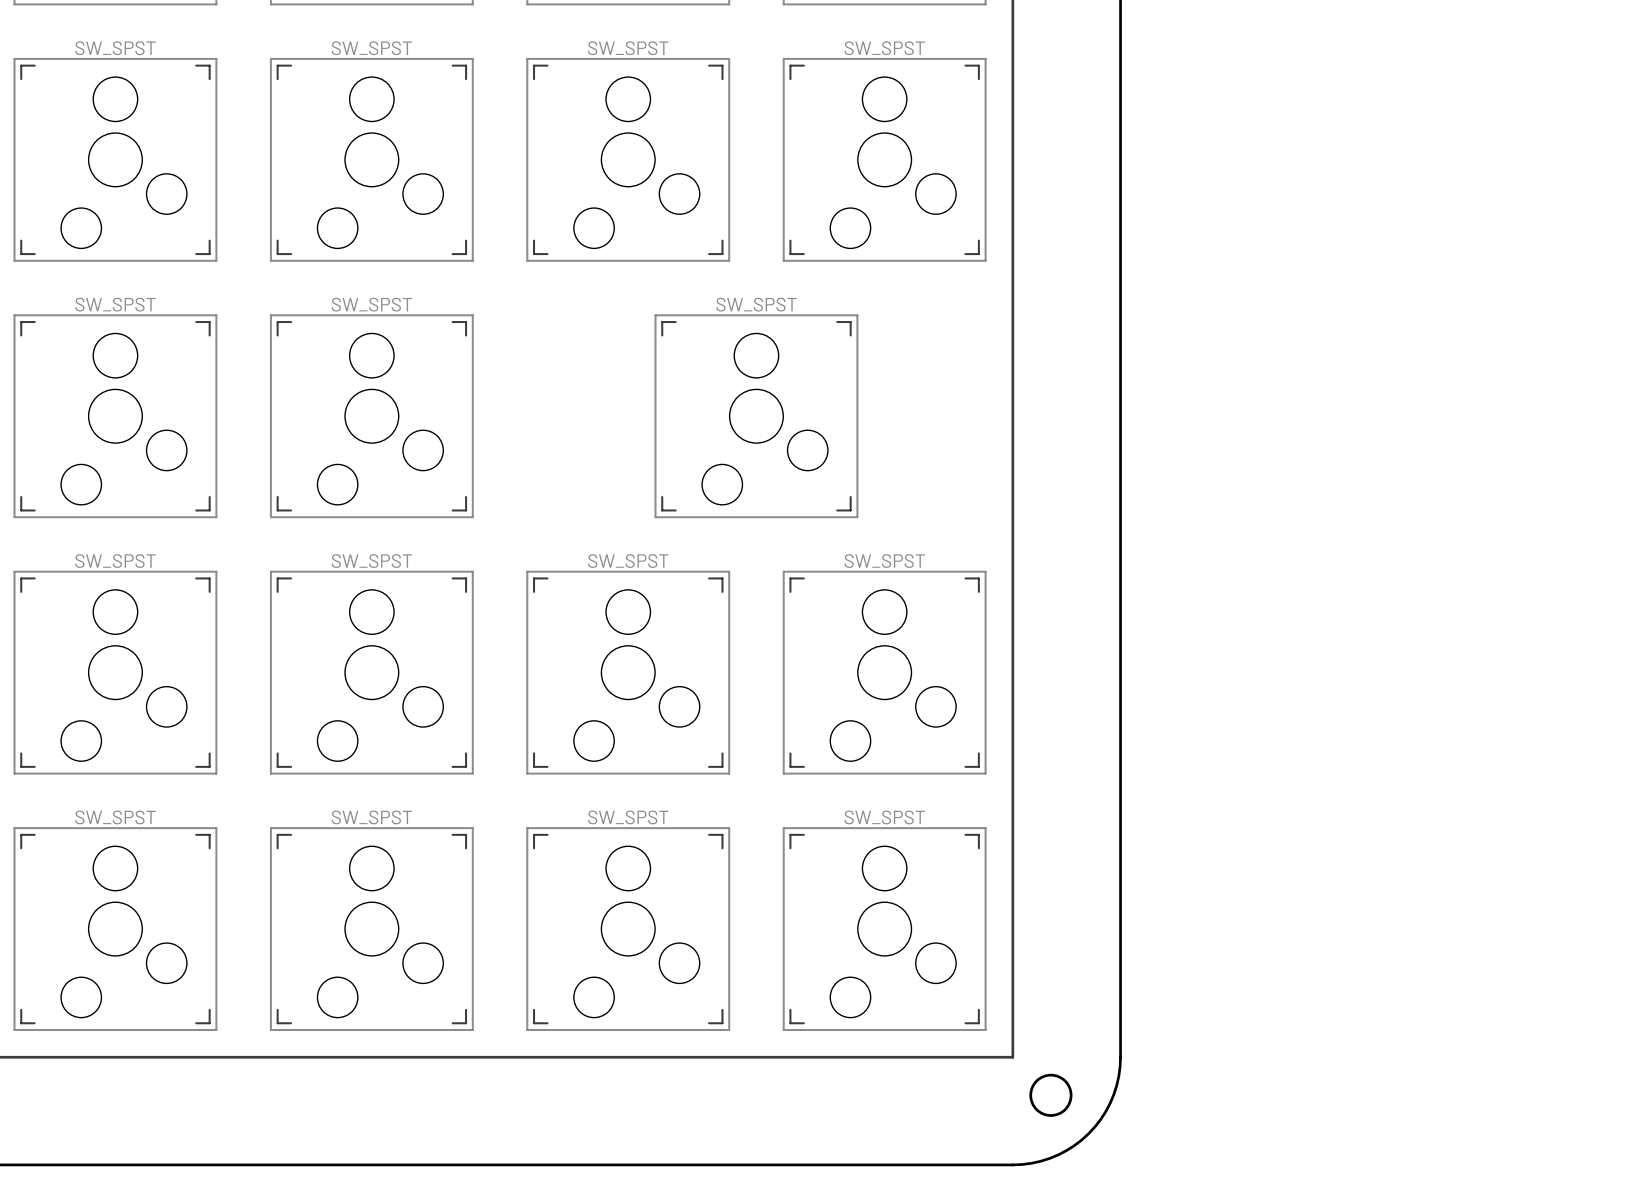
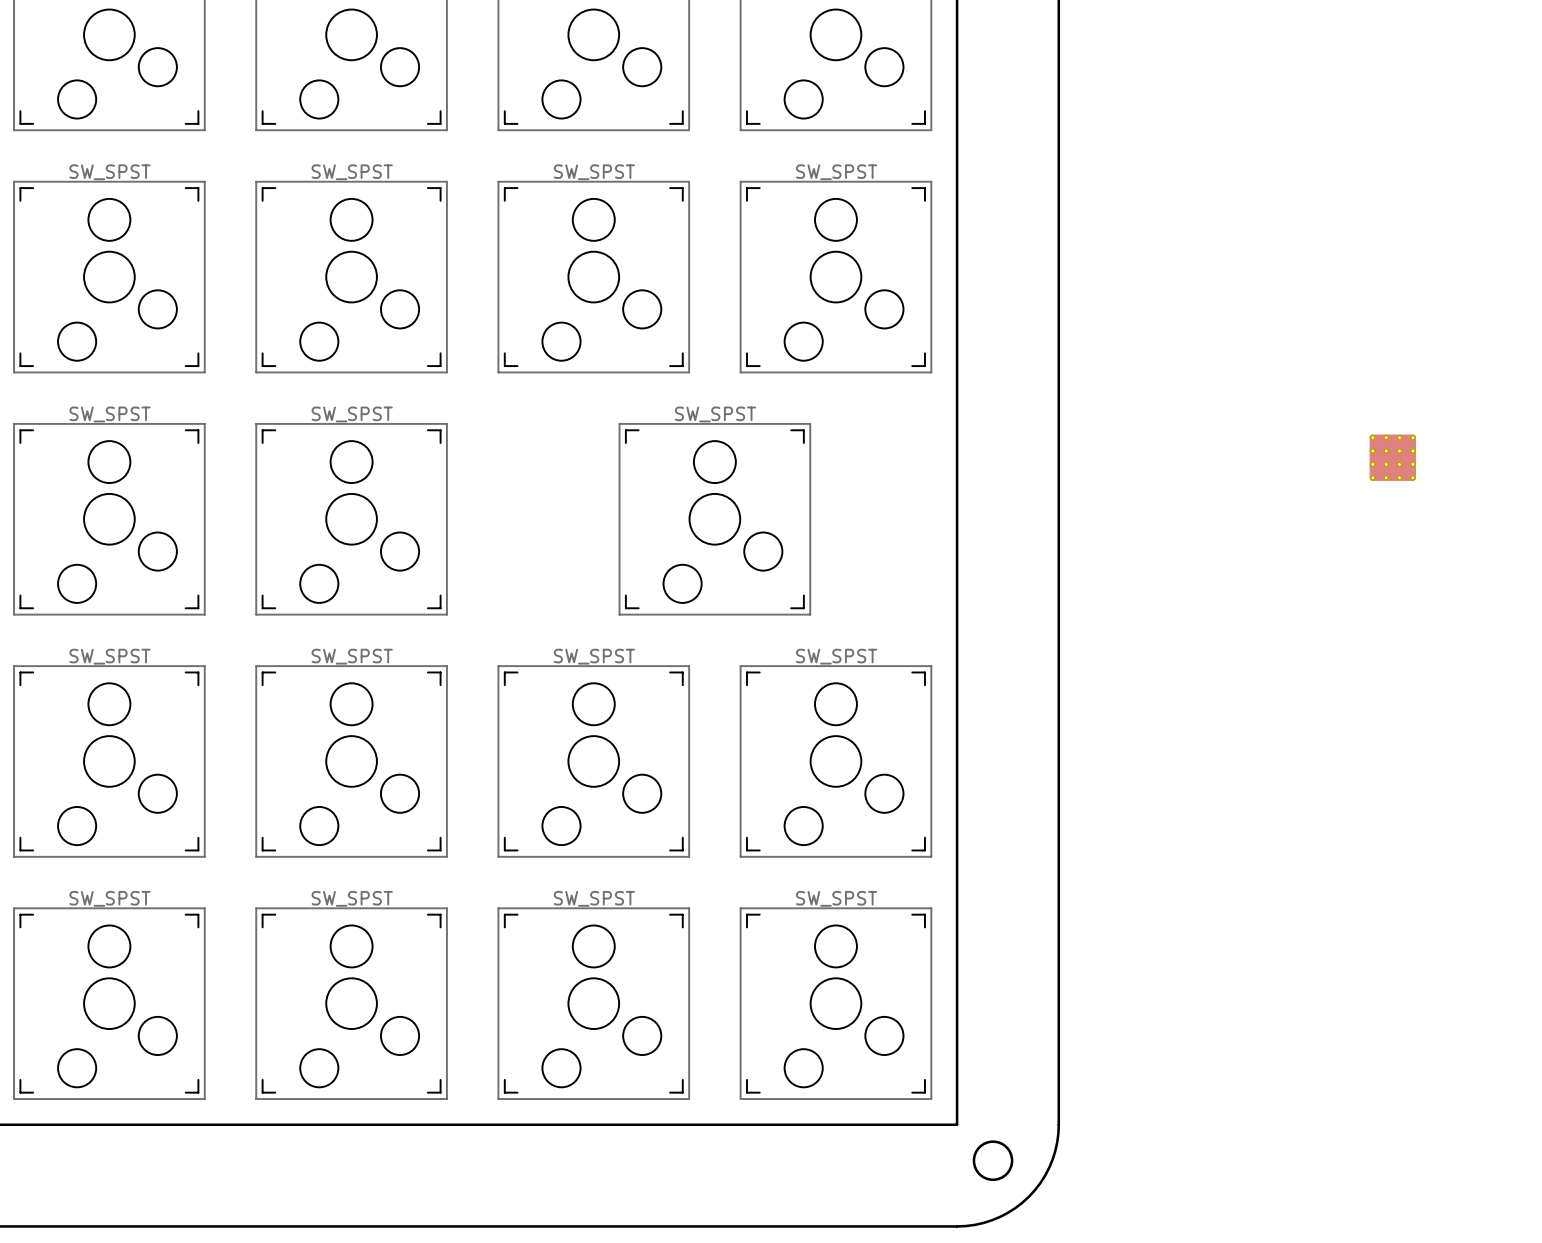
part: none -> (1392, 457)

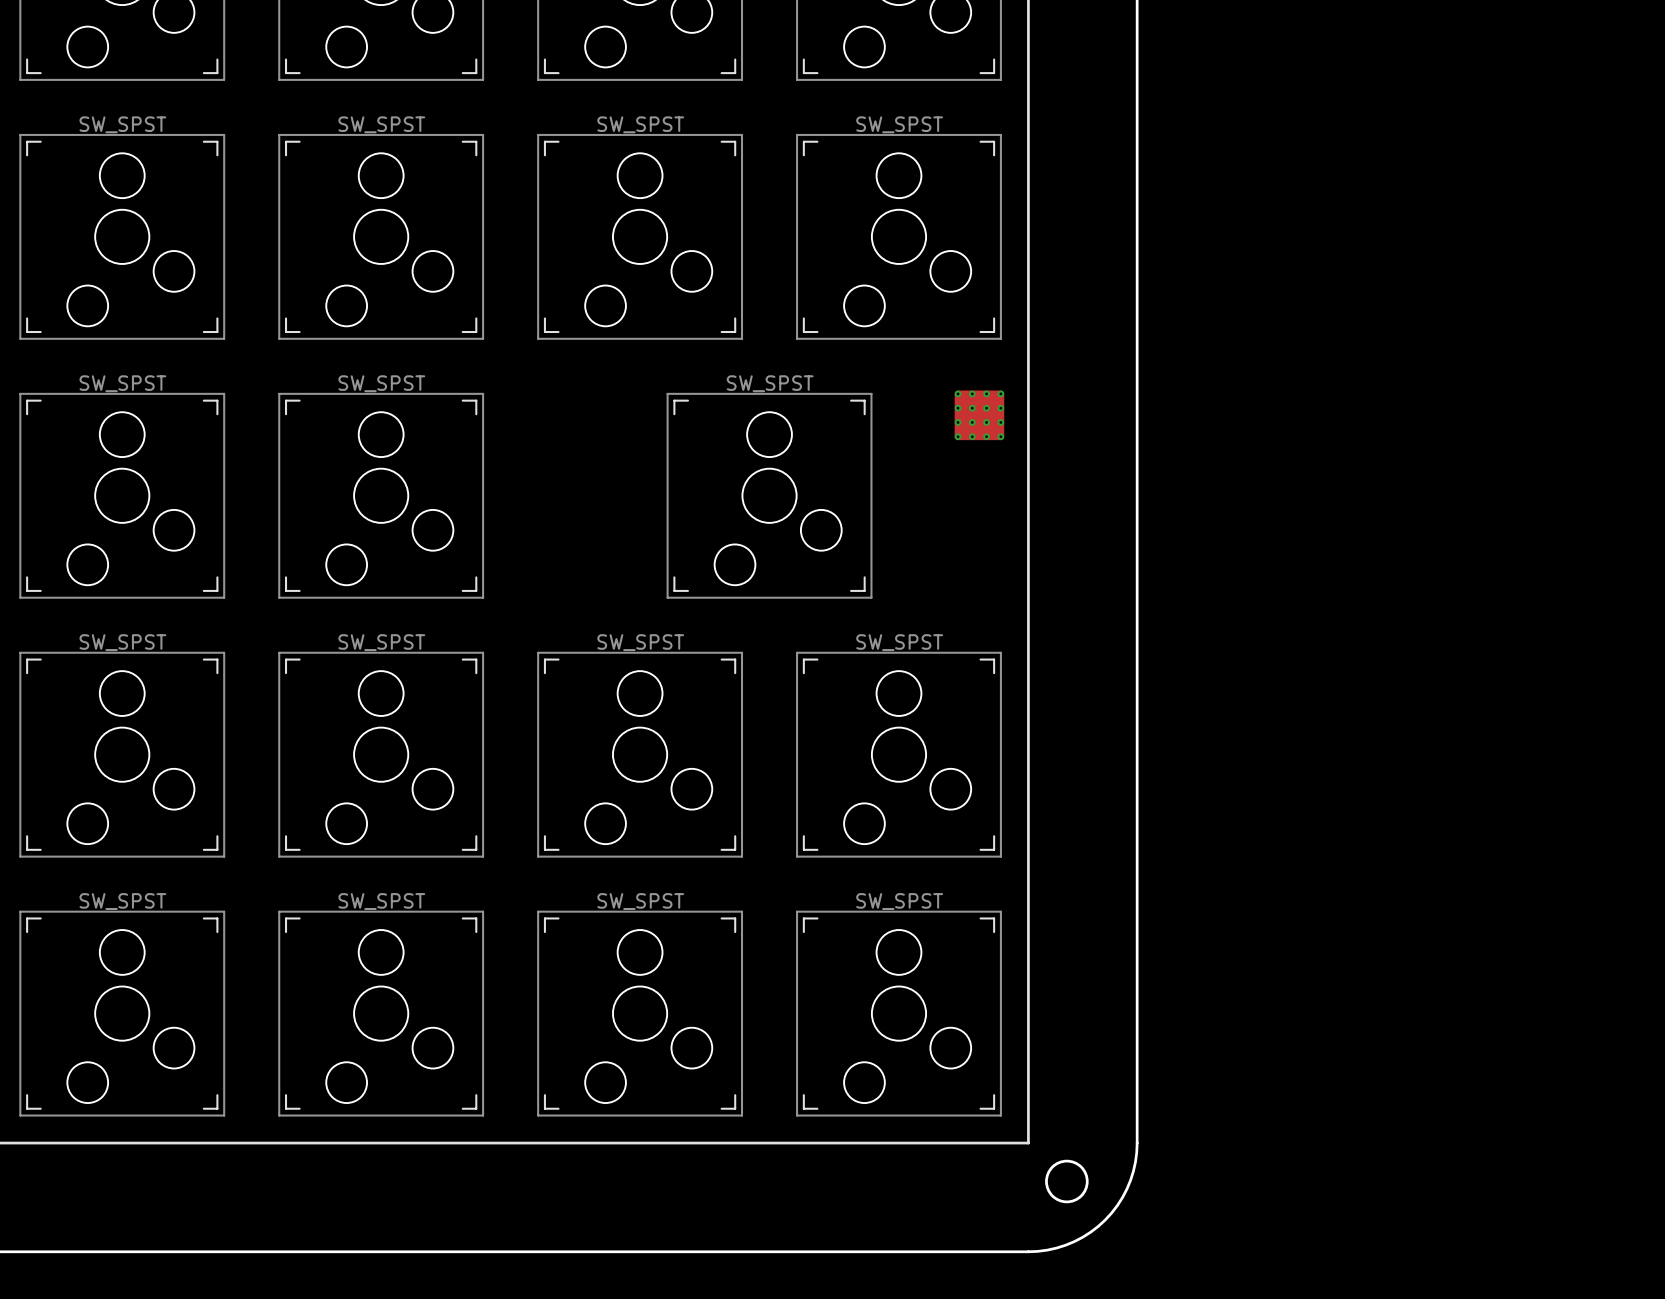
part: none -> (979, 415)
part: (1392, 457) -> none

